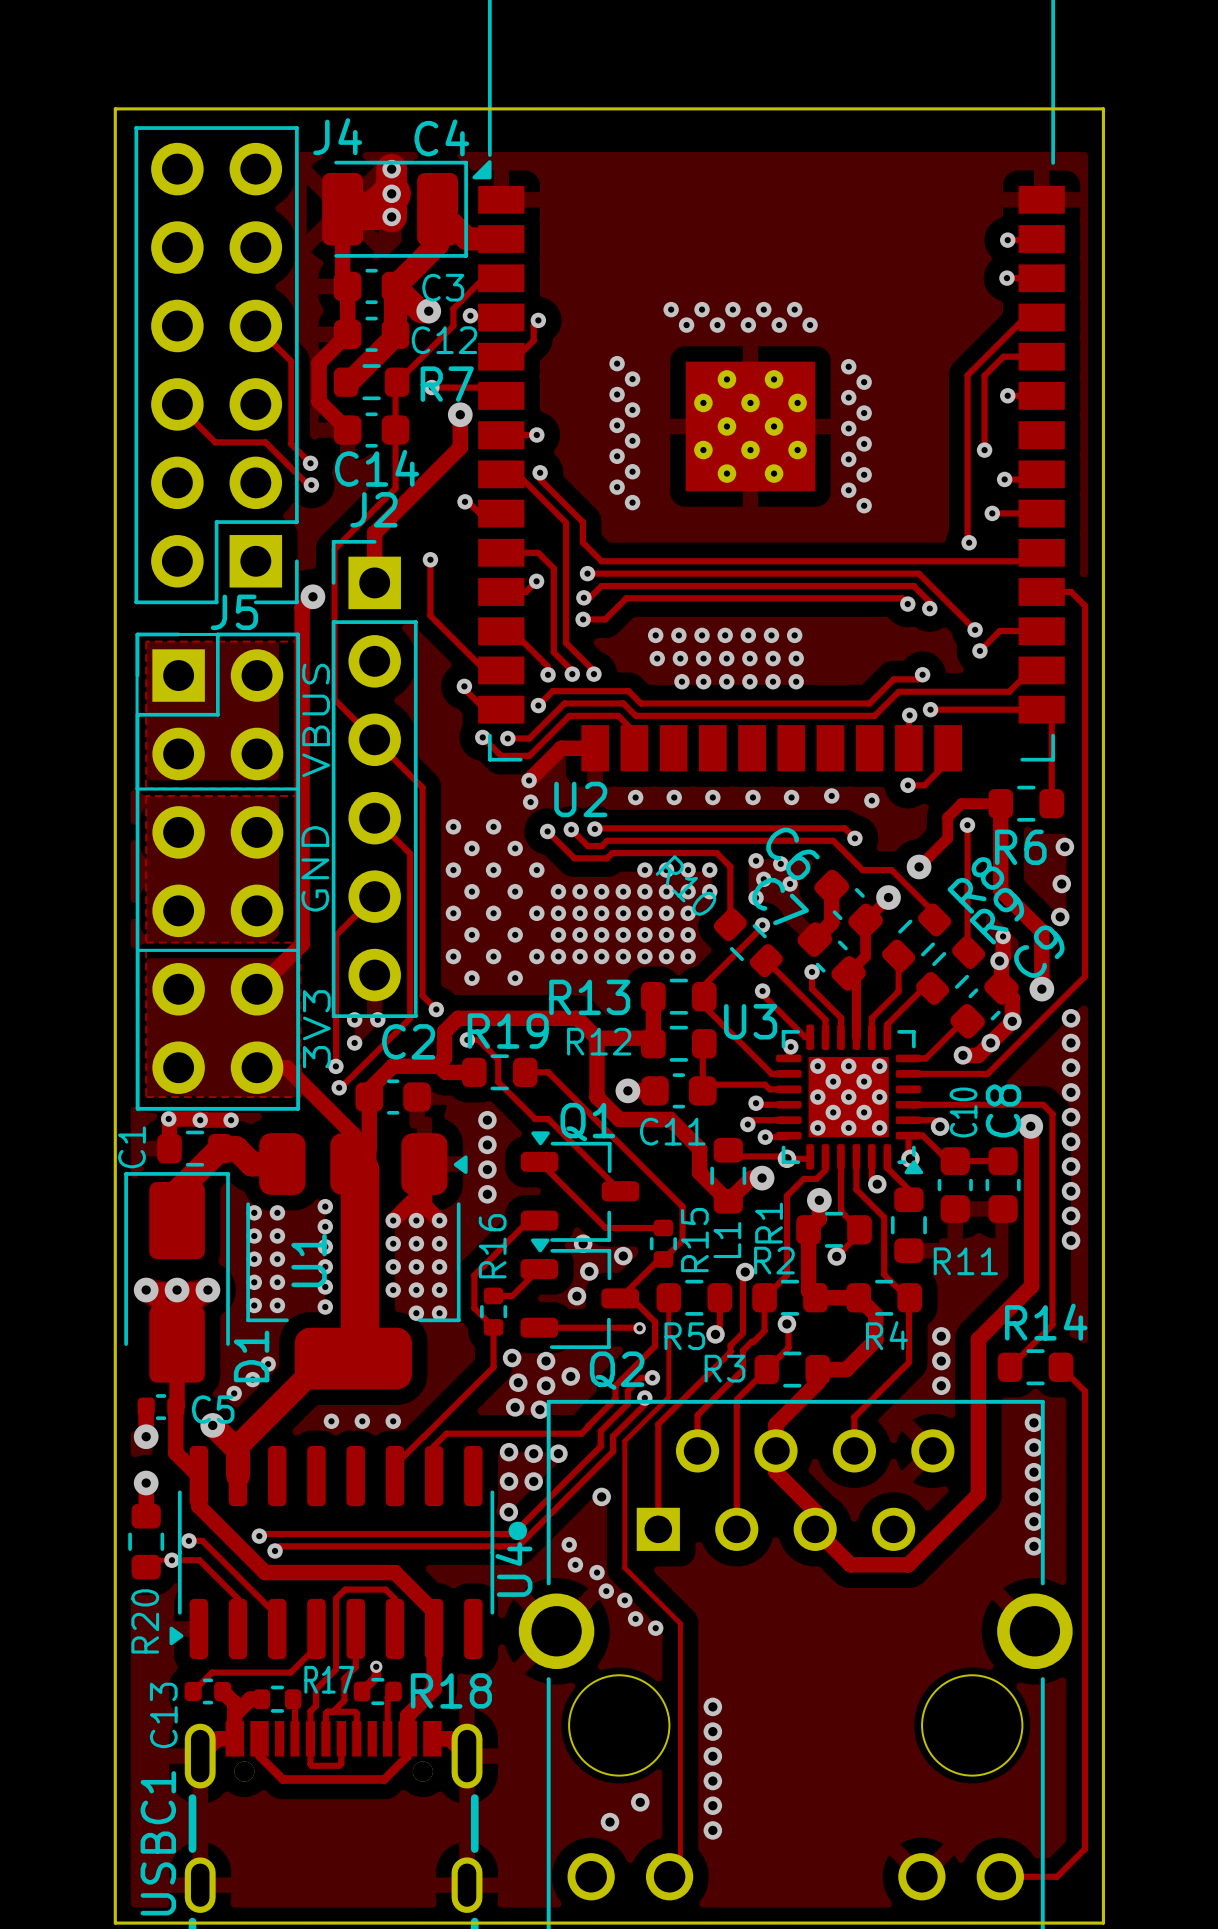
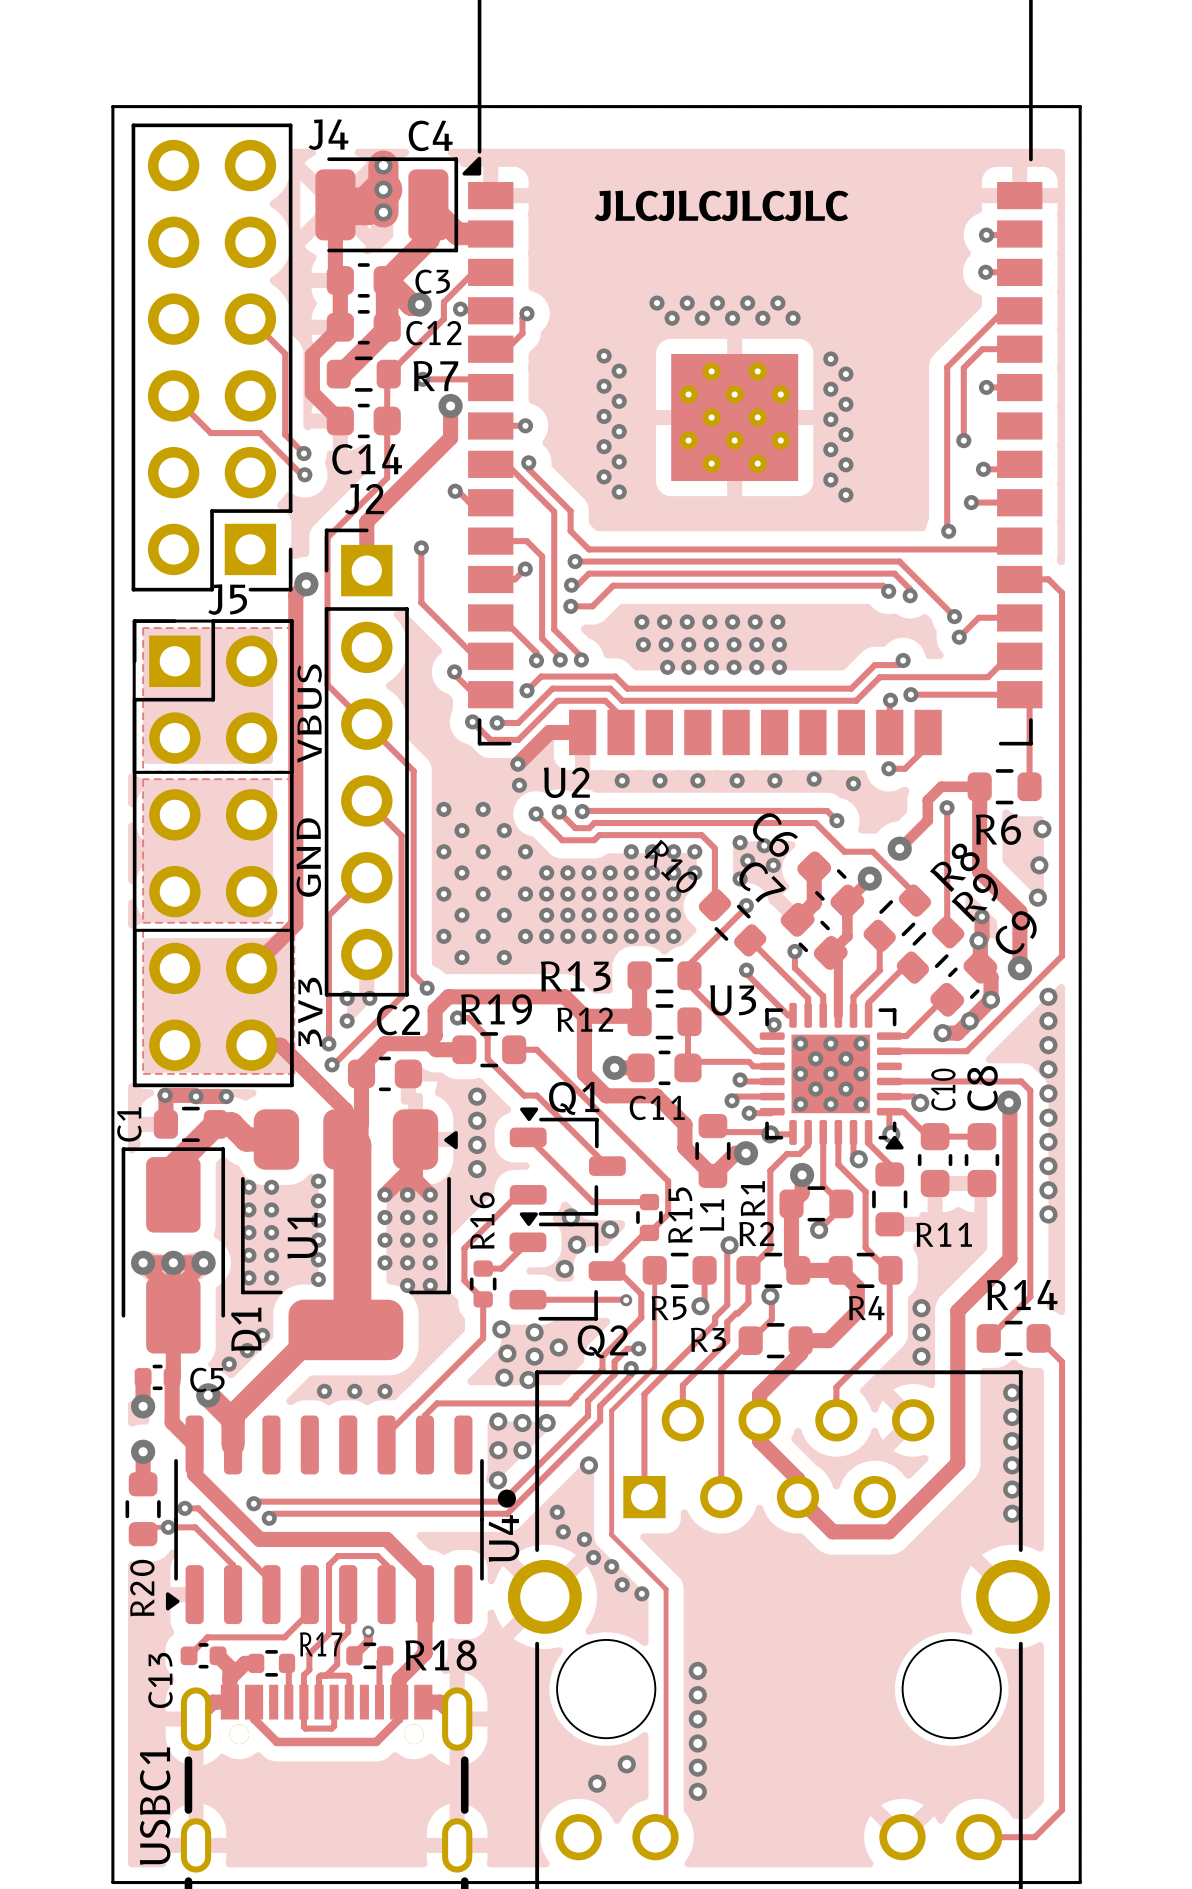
text: none -> JLCJLCJLCJLC (721, 205)

